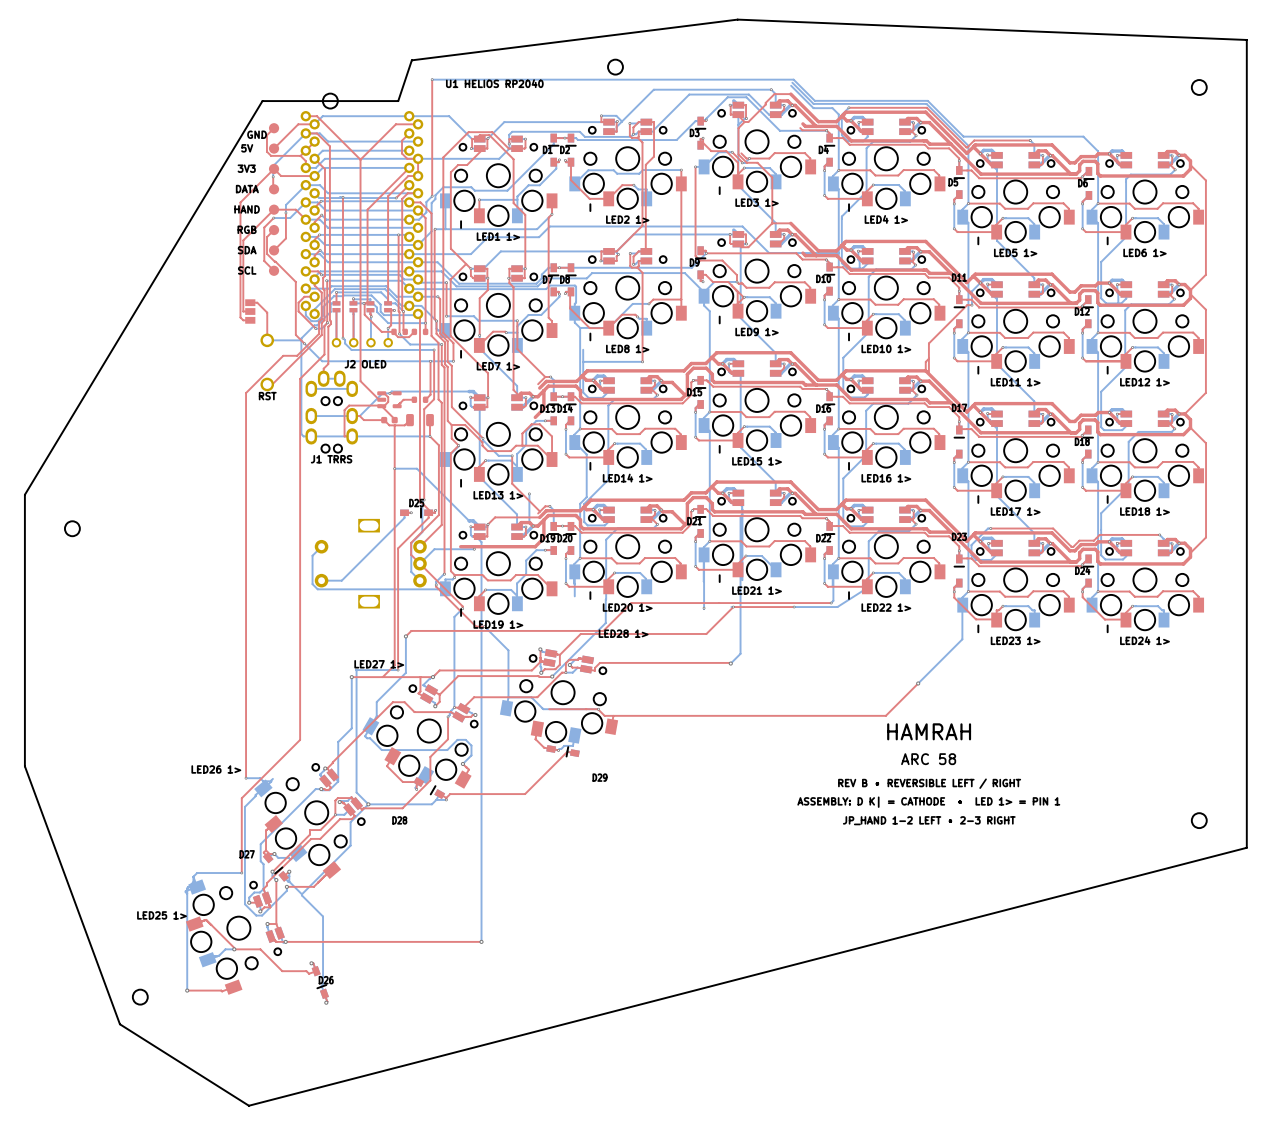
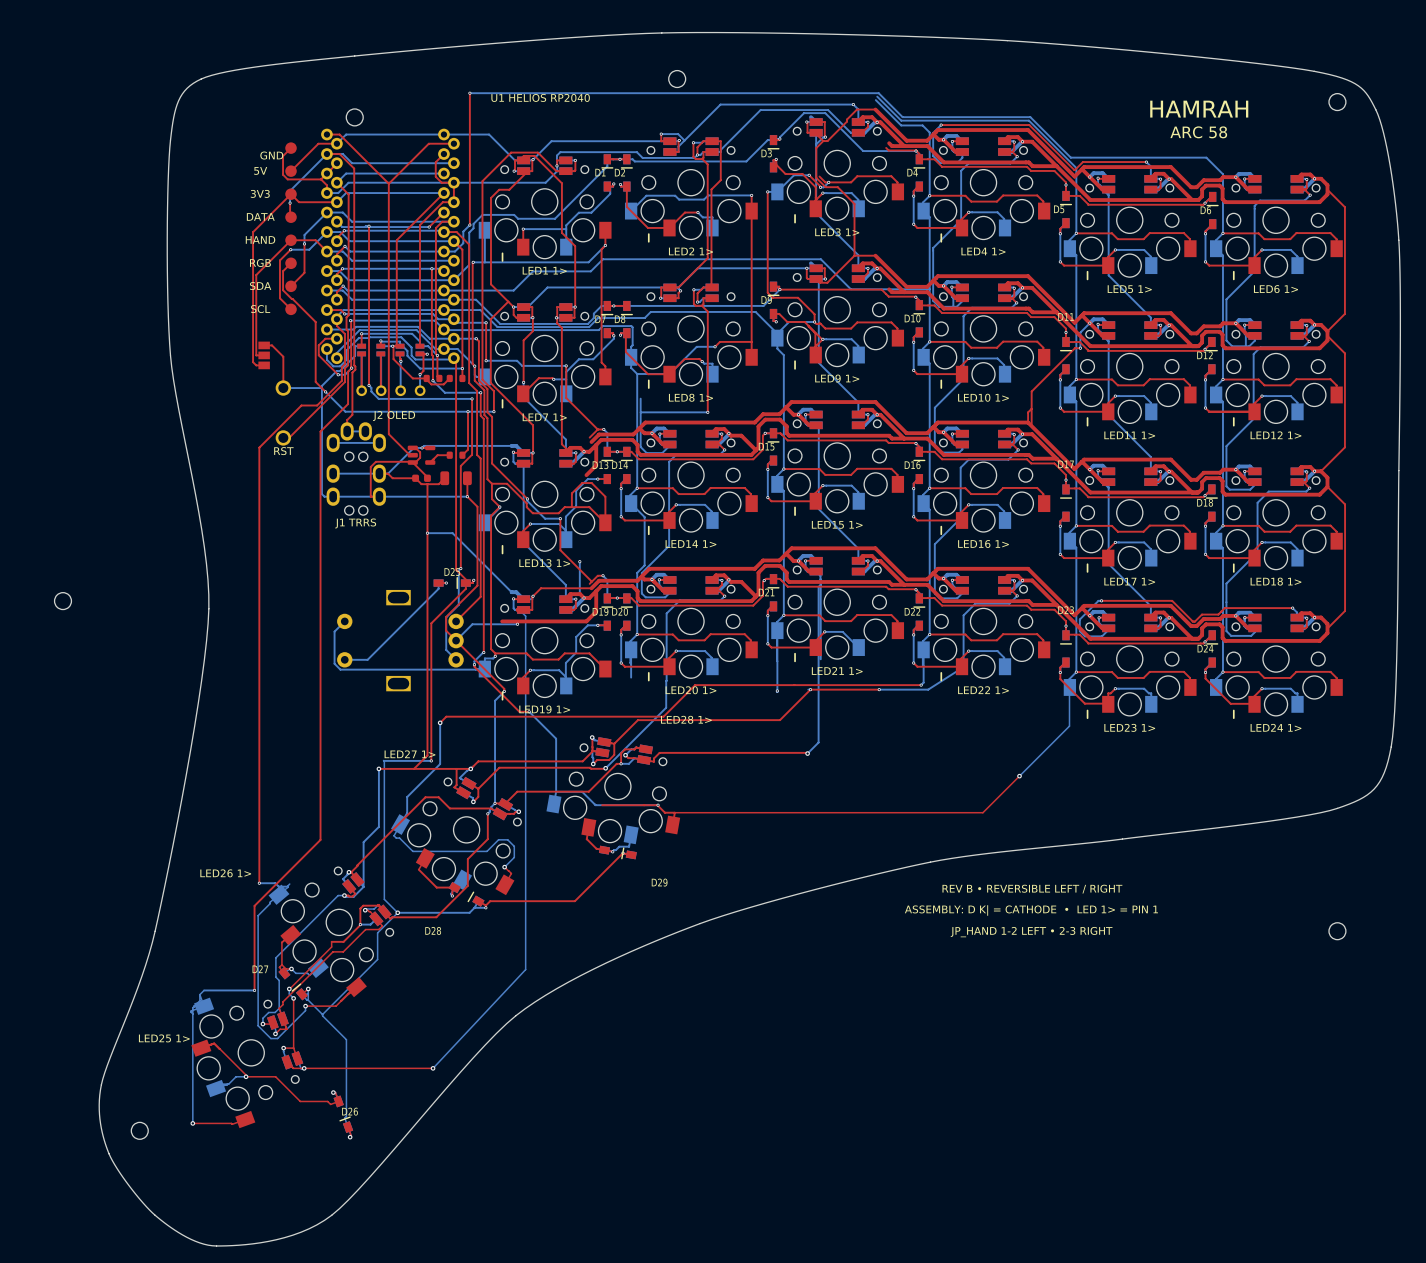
board edge: (737, 19) (411, 60) (398, 101) (262, 101) (24, 494) (24, 766) (119, 1024) (248, 1105) (1246, 847) (1246, 39) (737, 19) -> (661, 32) (477, 44) (254, 67) (218, 73) (201, 79) (187, 88) (177, 104) (171, 134) (168, 180) (167, 270) (169, 343) (175, 394) (204, 547) (208, 594) (208, 623) (190, 750) (155, 931) (141, 976) (104, 1072) (100, 1089) (99, 1109) (102, 1132) (107, 1150) (126, 1181) (155, 1215) (174, 1230) (195, 1241) (216, 1245) (260, 1242) (292, 1235) (324, 1220) (358, 1189) (473, 1058) (515, 1015) (545, 995) (580, 975) (679, 931) (722, 915) (781, 898) (940, 860) (1236, 825) (1320, 812) (1343, 806) (1363, 797) (1376, 785) (1384, 772) (1392, 737) (1396, 676) (1399, 260) (1395, 203) (1386, 148) (1377, 114) (1363, 90) (1355, 83) (1341, 78) (1304, 69) (1083, 46) (907, 36) (661, 32)
text: none -> HAMRAH (1199, 109)
text: none -> ARC 58 (1198, 132)
text: HAMRAH (929, 731) -> none
text: ARC 58 (928, 759) -> none
bottom track: (481, 854) (481, 941) -> (525, 969) (433, 1068)
top track: (399, 941) (481, 941) -> none
via: none -> (433, 1068)
via: (481, 941) -> none

